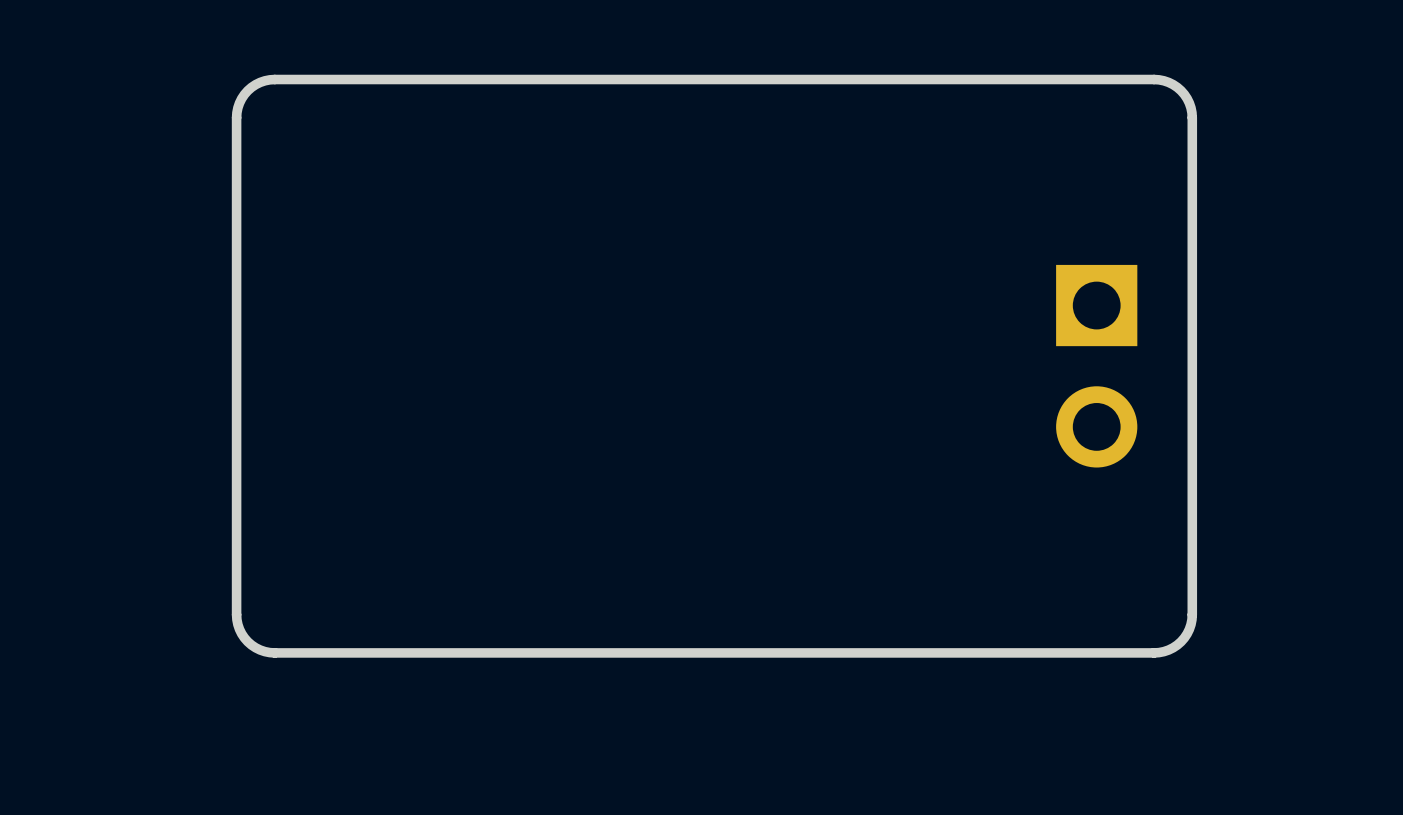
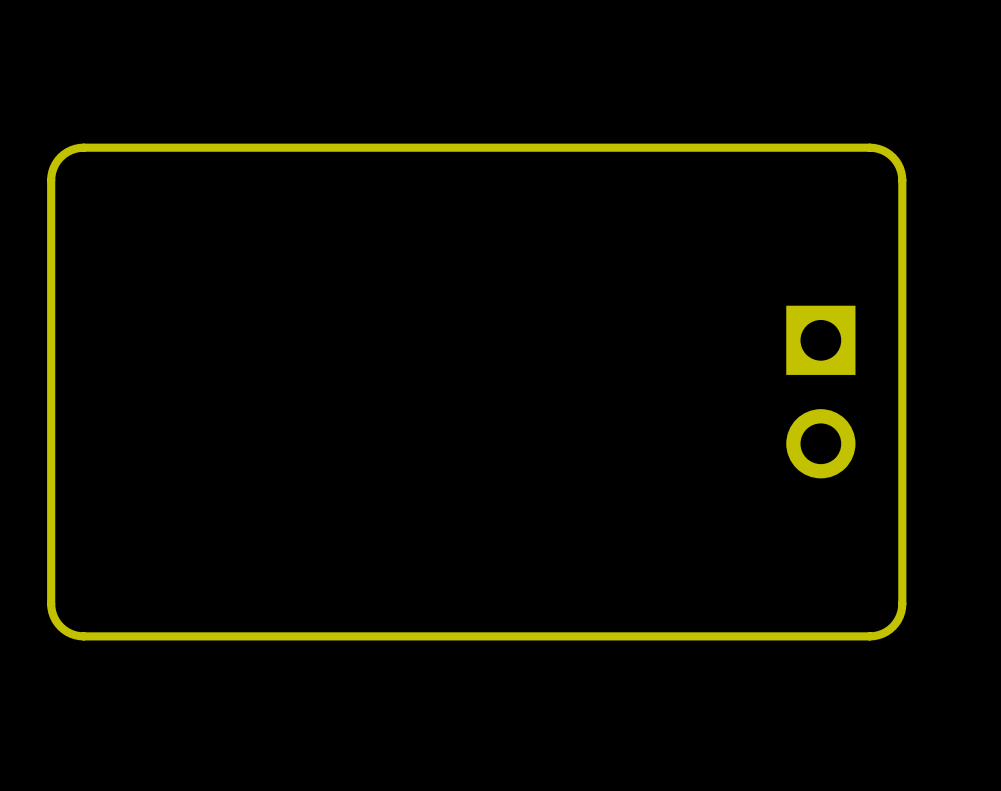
board edge: (274, 79) (260, 82) (247, 90) (239, 103) (236, 117) (236, 619) (241, 633) (247, 641) (260, 650) (274, 652) -> (120, 147) (83, 147) (71, 150) (60, 157) (55, 163) (51, 180) (51, 608) (57, 623) (71, 633) (83, 636) (120, 636)

